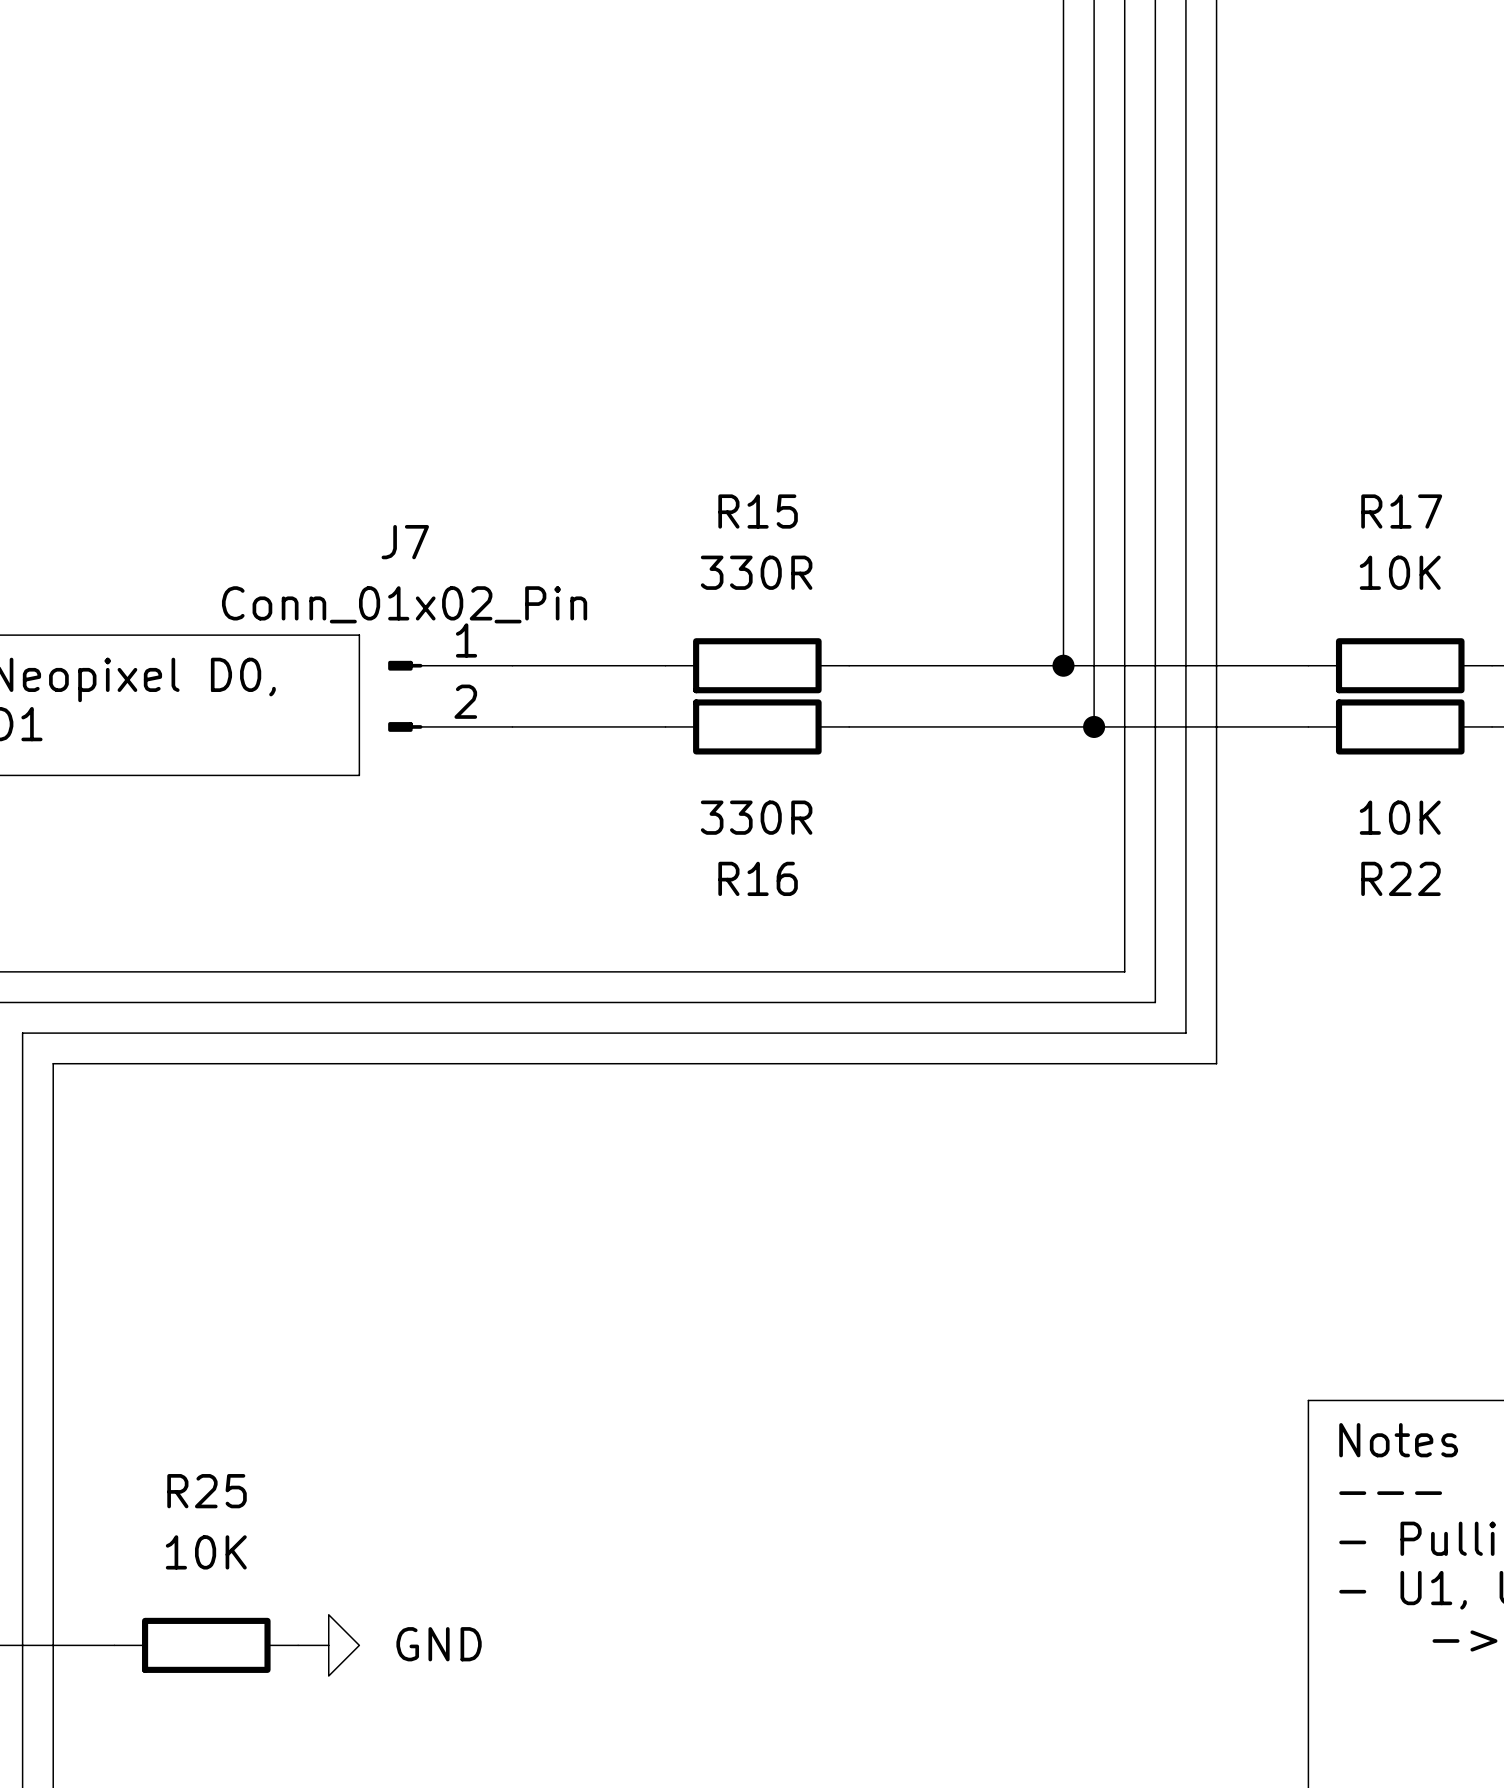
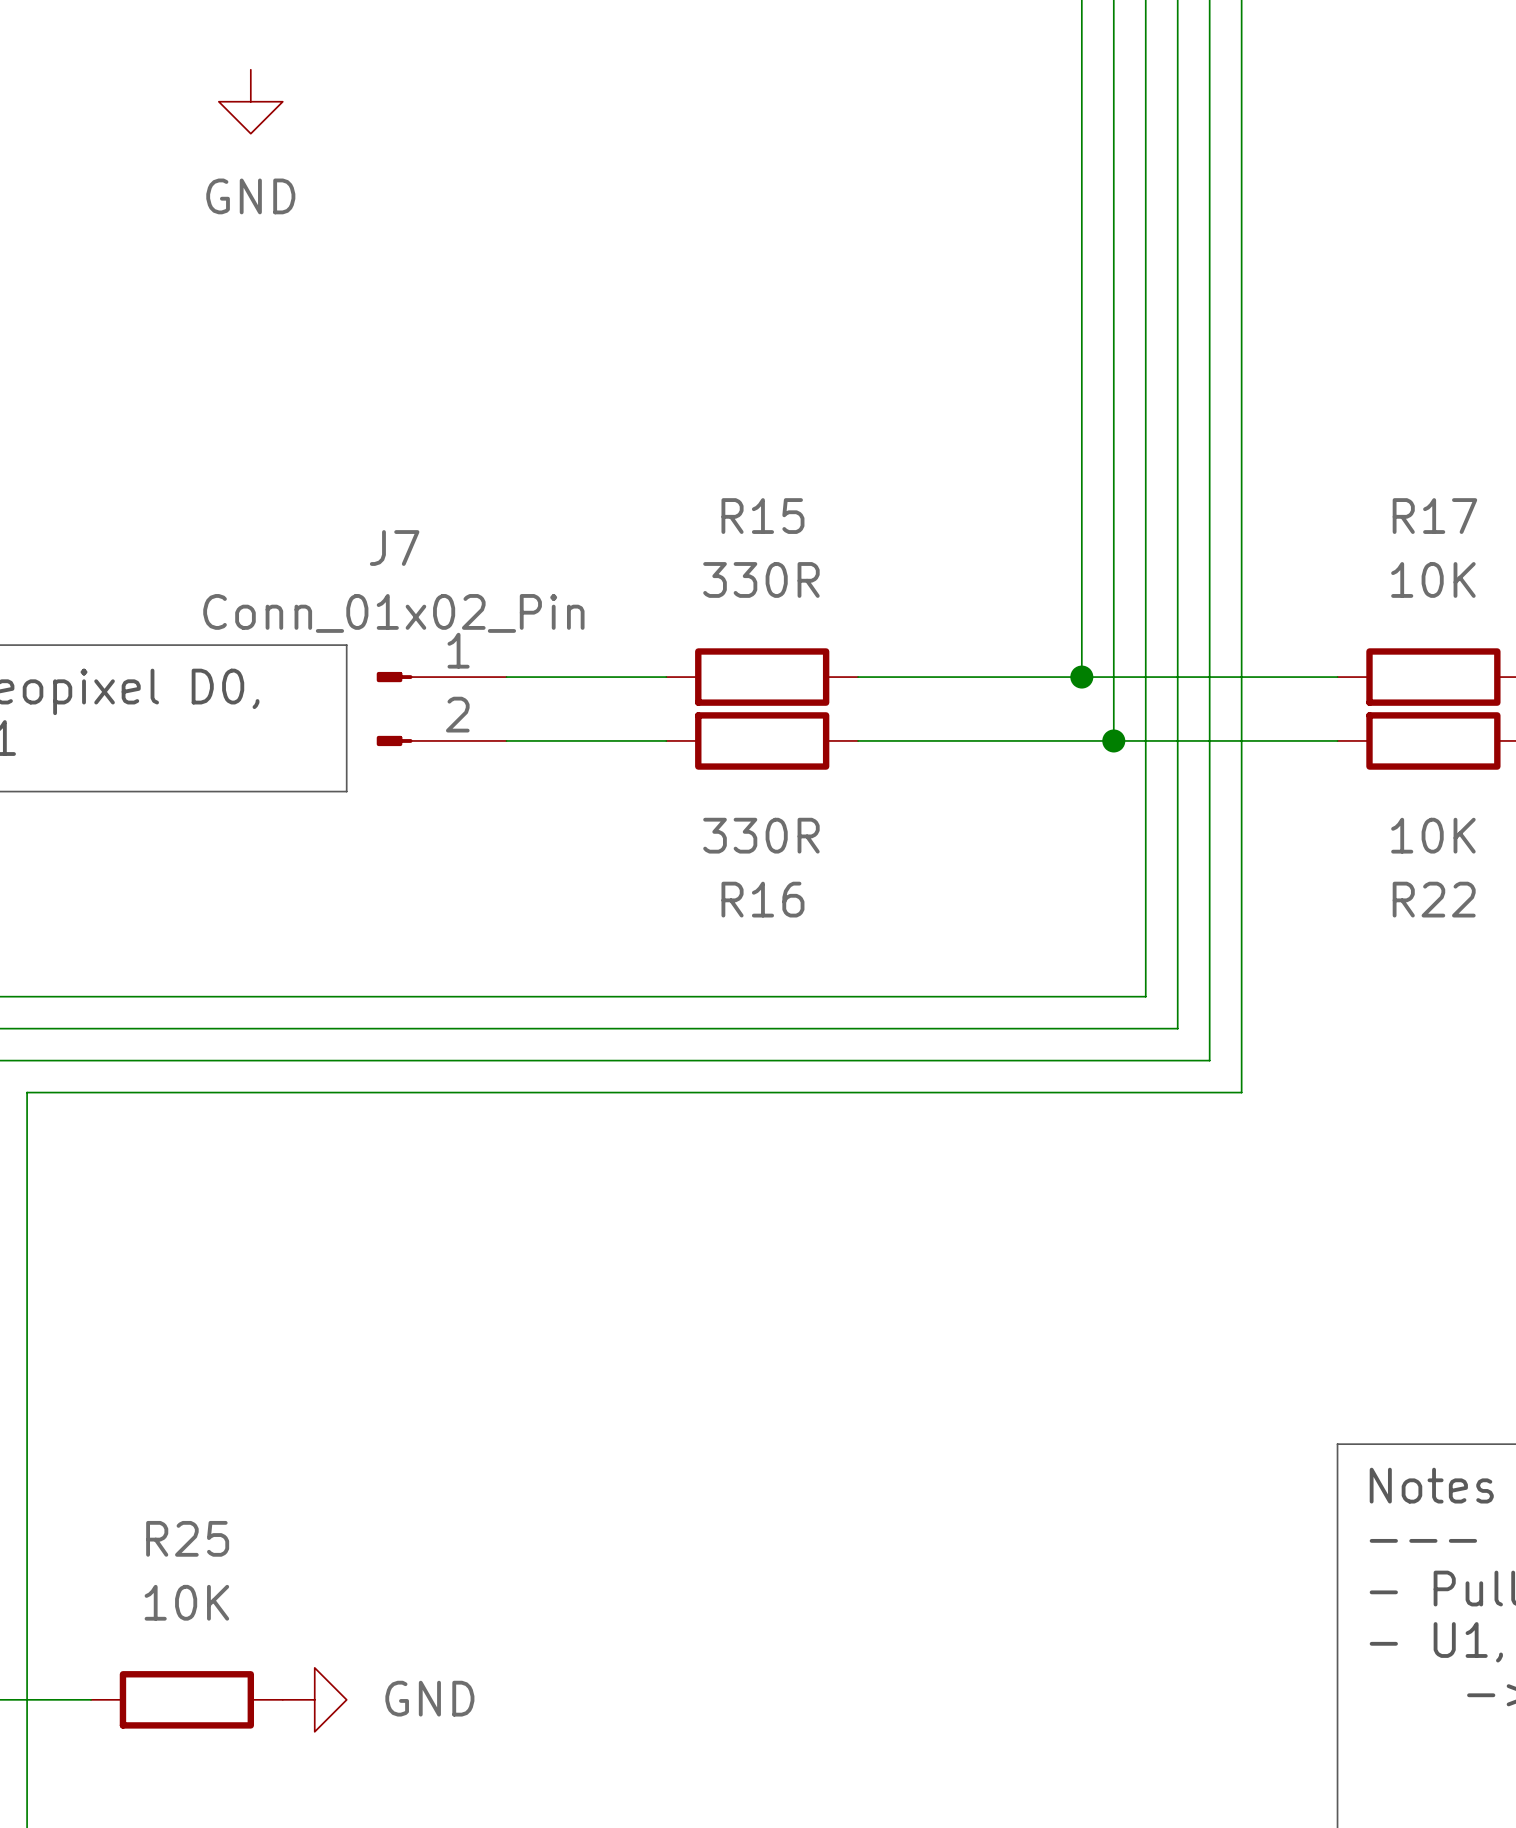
power symbol: none -> GND (250, 101)

